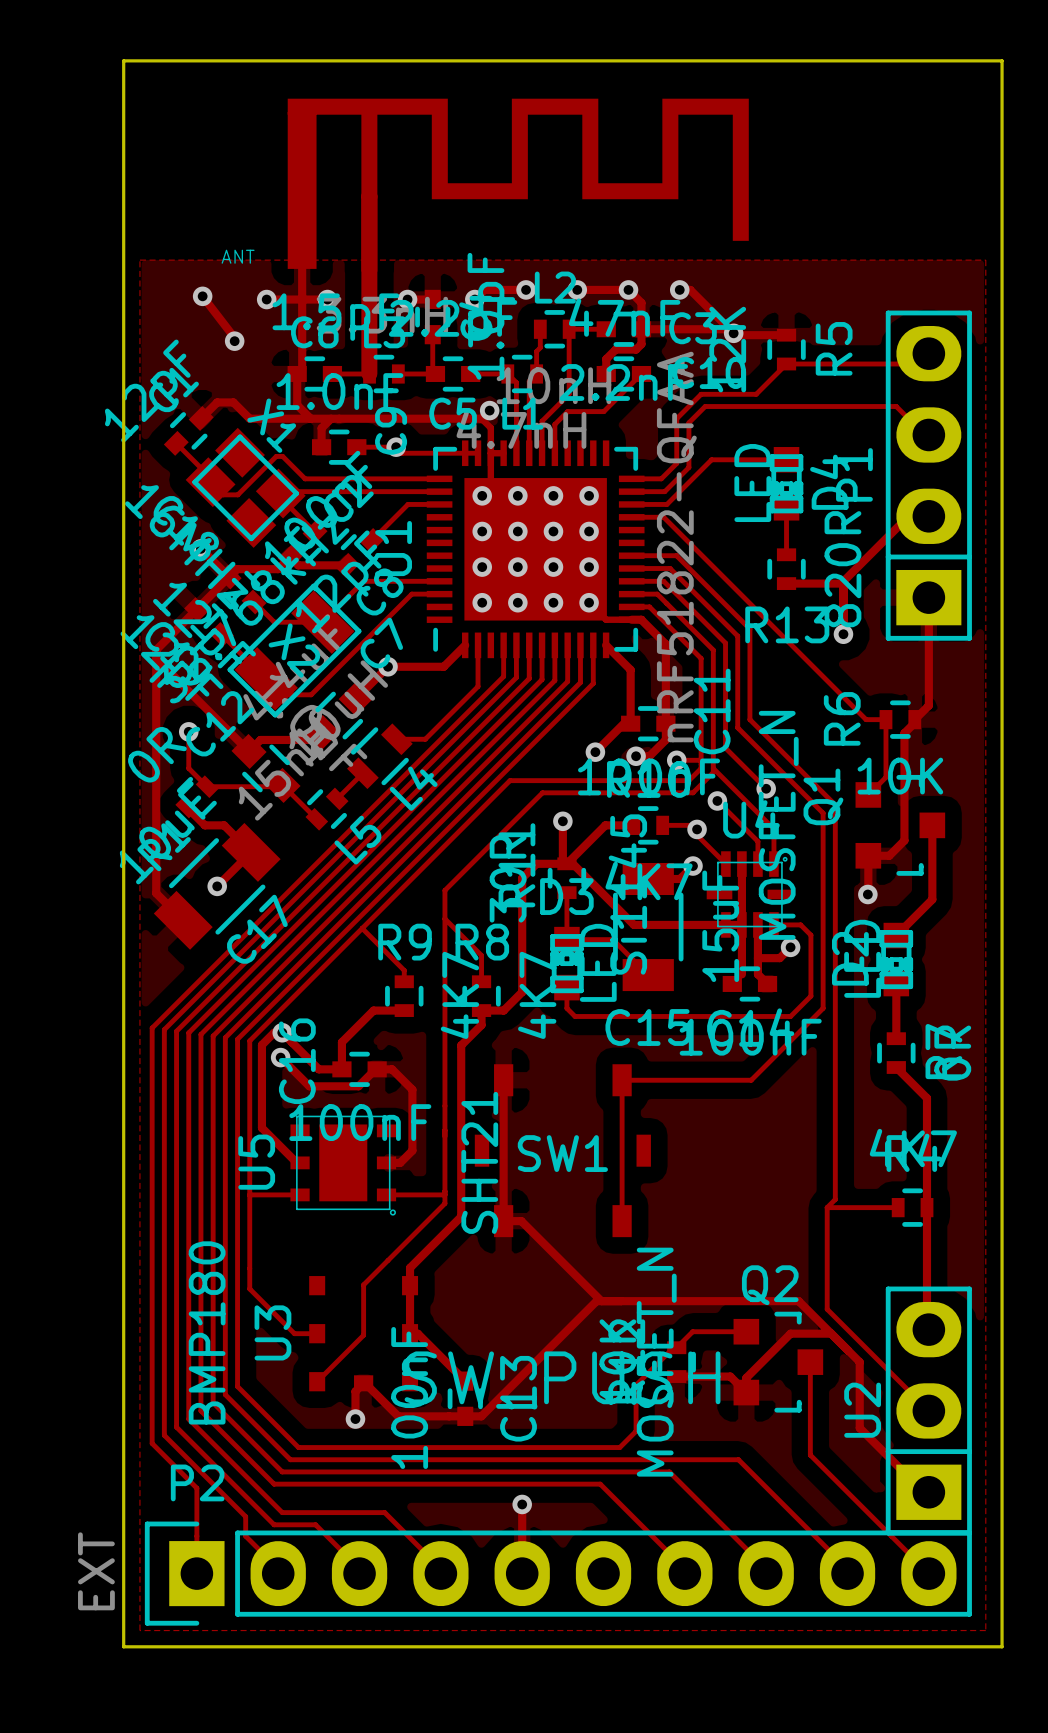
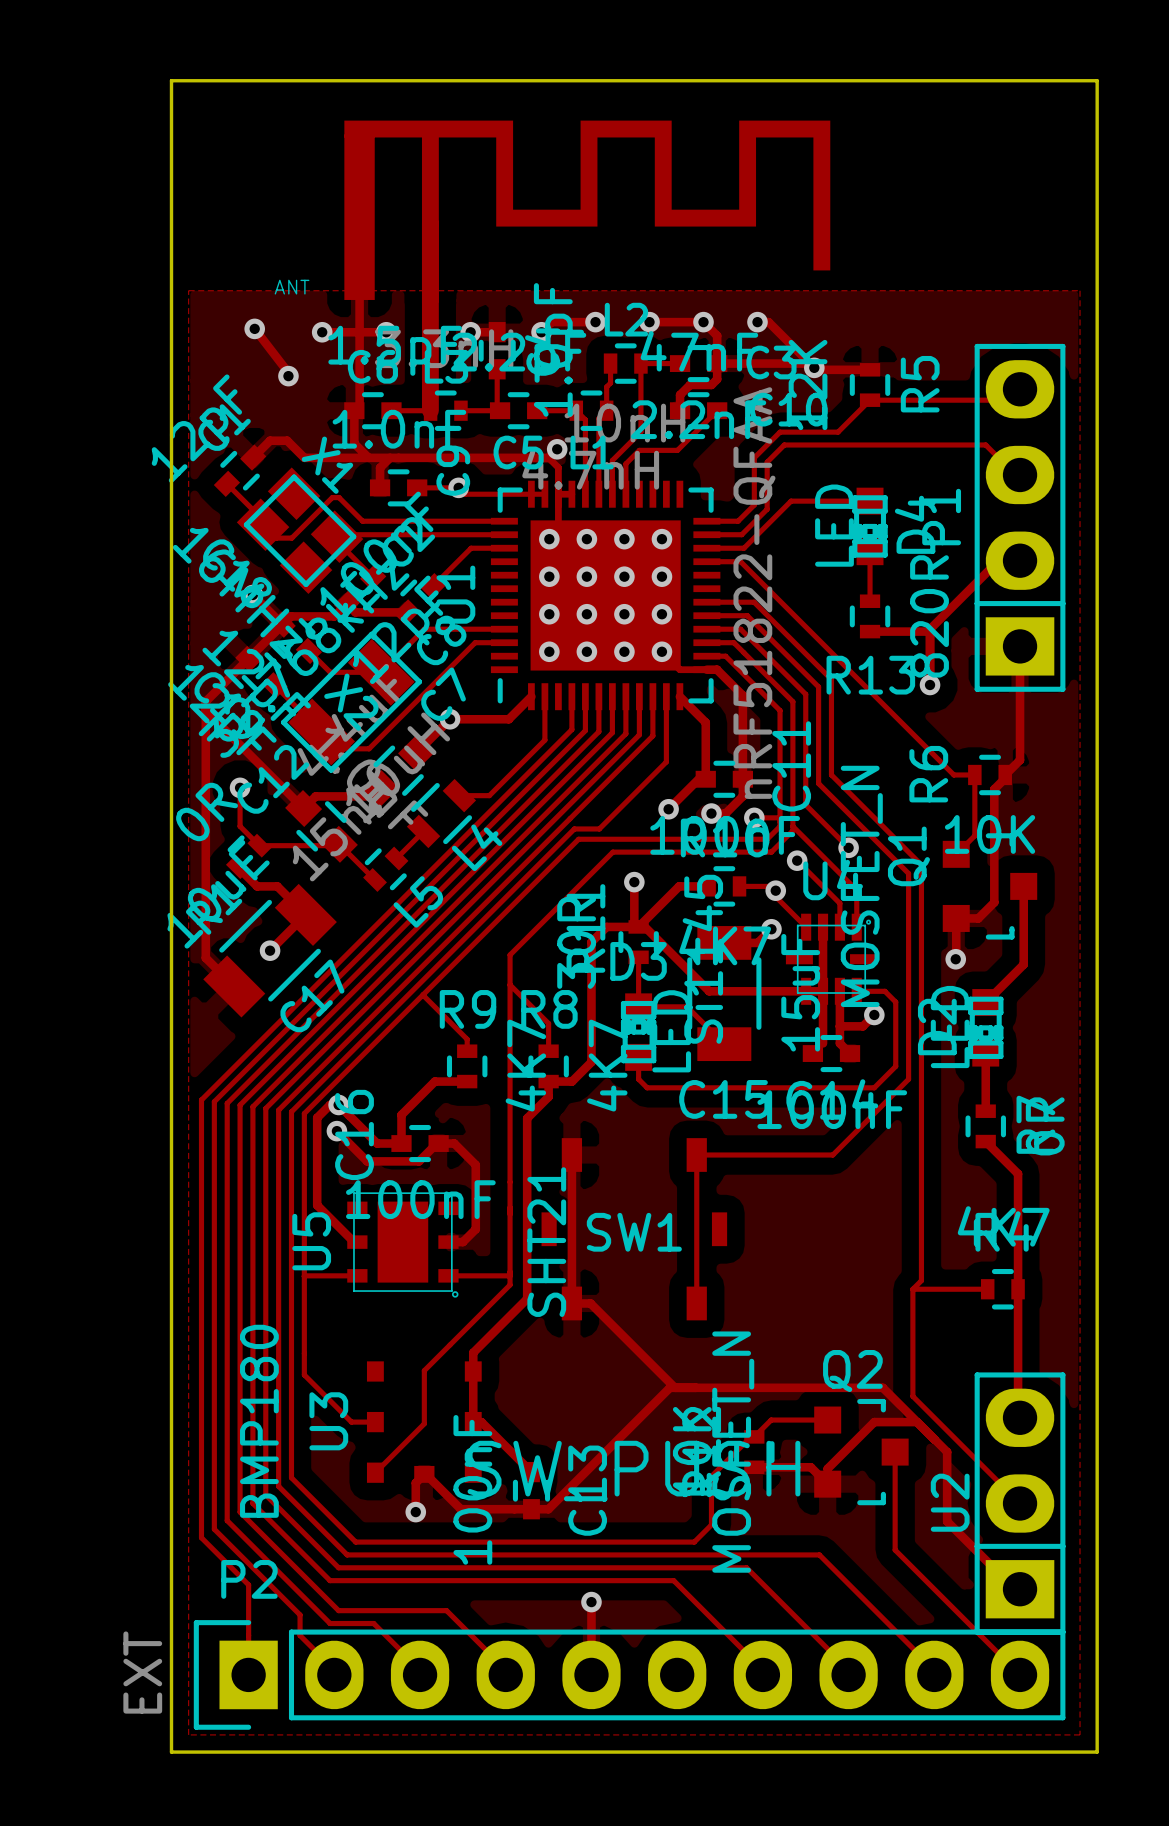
track: (593, 683) (505, 770) -> (666, 736) (666, 761) (599, 828) (574, 828)

